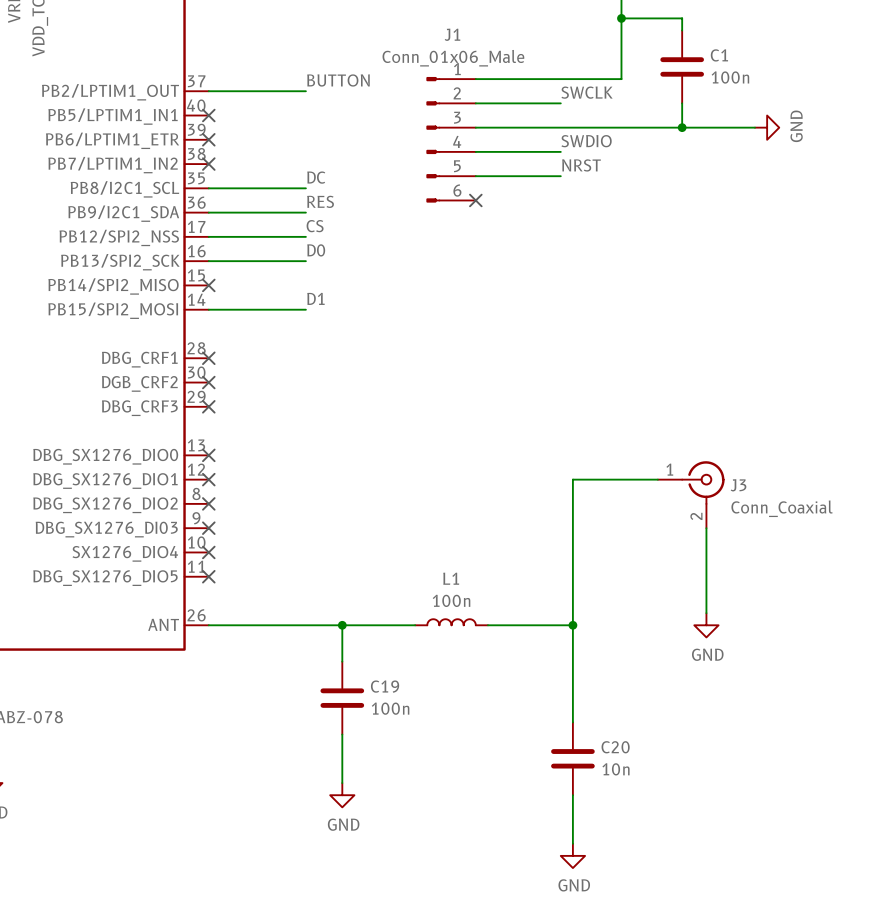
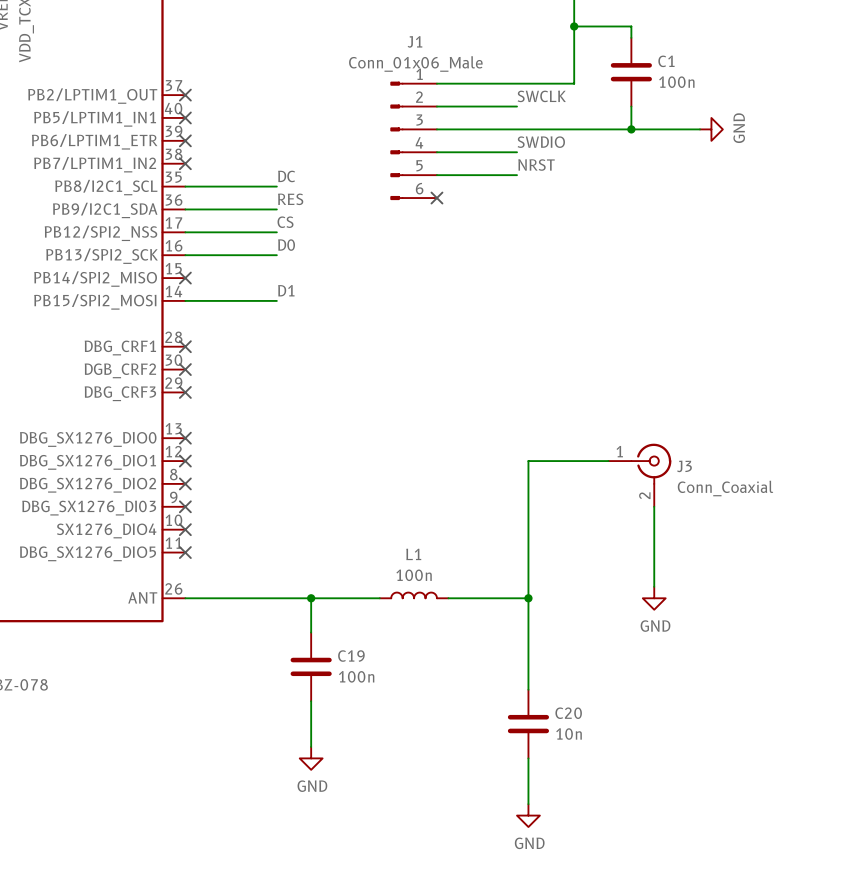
label: BUTTON (338, 80) -> none
wire: (208, 91) (305, 91) -> none
no-connect mark: none -> (185, 95)

